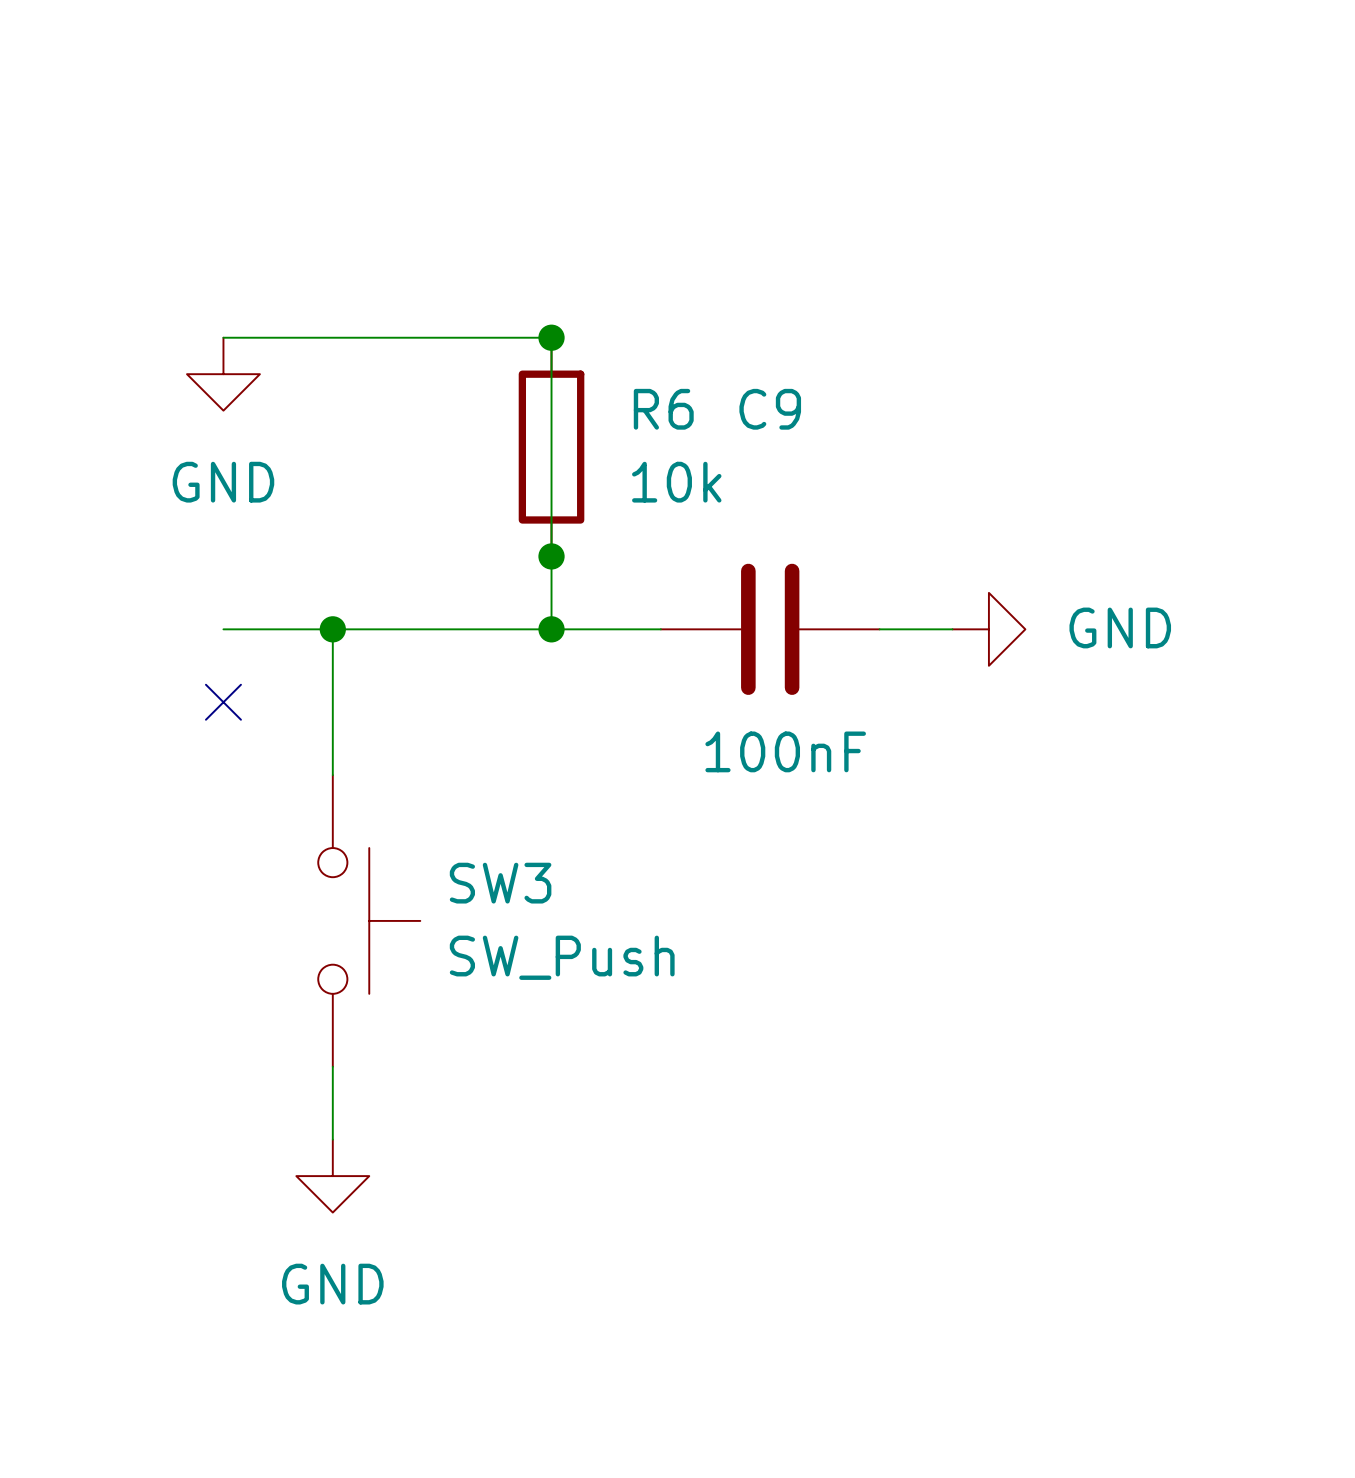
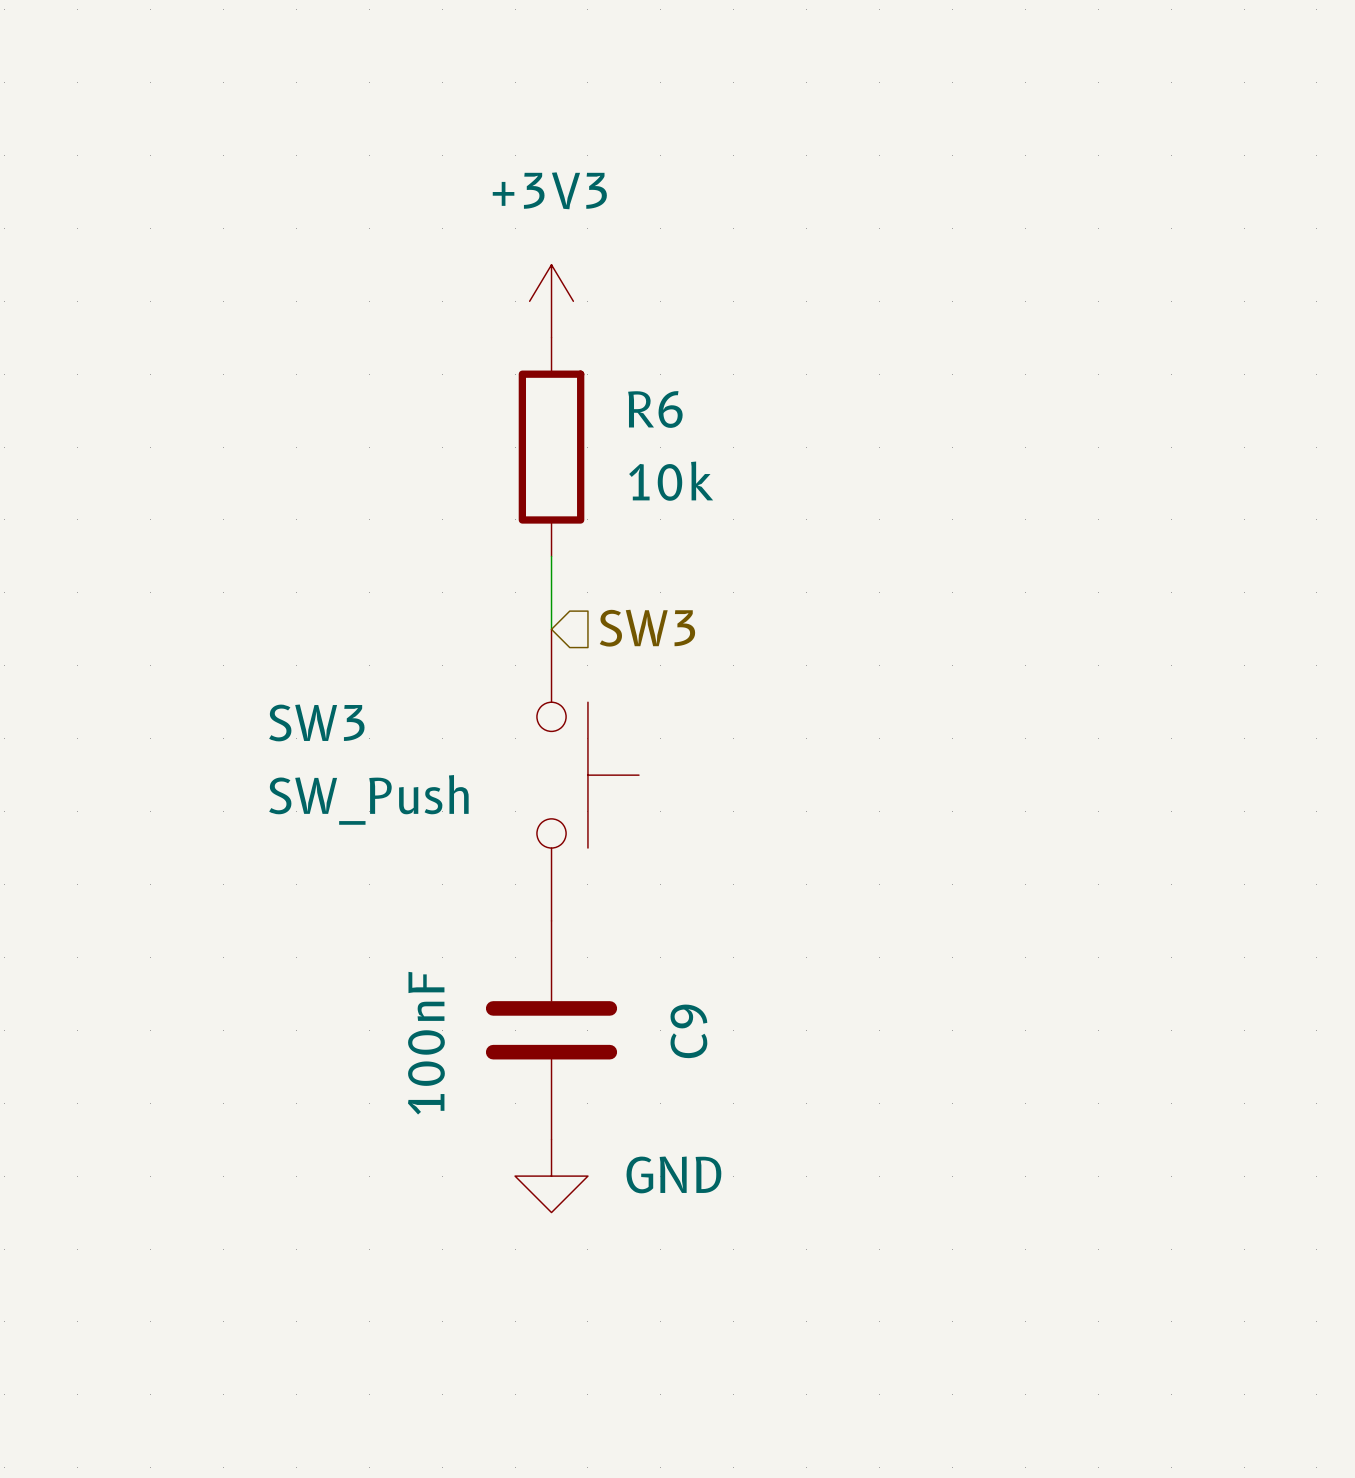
power symbol: none -> +3V3 (551, 301)
wire: (223, 337) (551, 337) (551, 556) -> none
junction: (551, 337) -> none
power symbol: GND (223, 374) -> none
C9 name position: C9 (770, 409) -> C9 (688, 1031)
junction: (551, 556) -> none
hierarchical label: none -> SW3 (647, 628)
wire: (223, 629) (660, 629) -> none
wire: (332, 629) (332, 775) -> none
junction: (332, 629) -> none
junction: (551, 629) -> none
C9 rotation: 0° (770, 629) -> 90° clockwise (551, 1030)
C9 position: (770, 629) -> (551, 1030)
wire: (879, 629) (952, 629) -> none
power symbol: GND (988, 629) -> none
no-connect mark: (223, 702) -> none
SW3 name position: SW3 (500, 883) -> SW3 (316, 722)
SW3 position: (369, 920) -> (587, 775)
SW3 value position: SW_Push (562, 957) -> SW_Push (368, 799)
wire: (332, 1066) (332, 1139) -> none
power symbol position: GND (332, 1176) -> GND (551, 1176)
power symbol text position: GND (332, 1284) -> GND (673, 1174)

